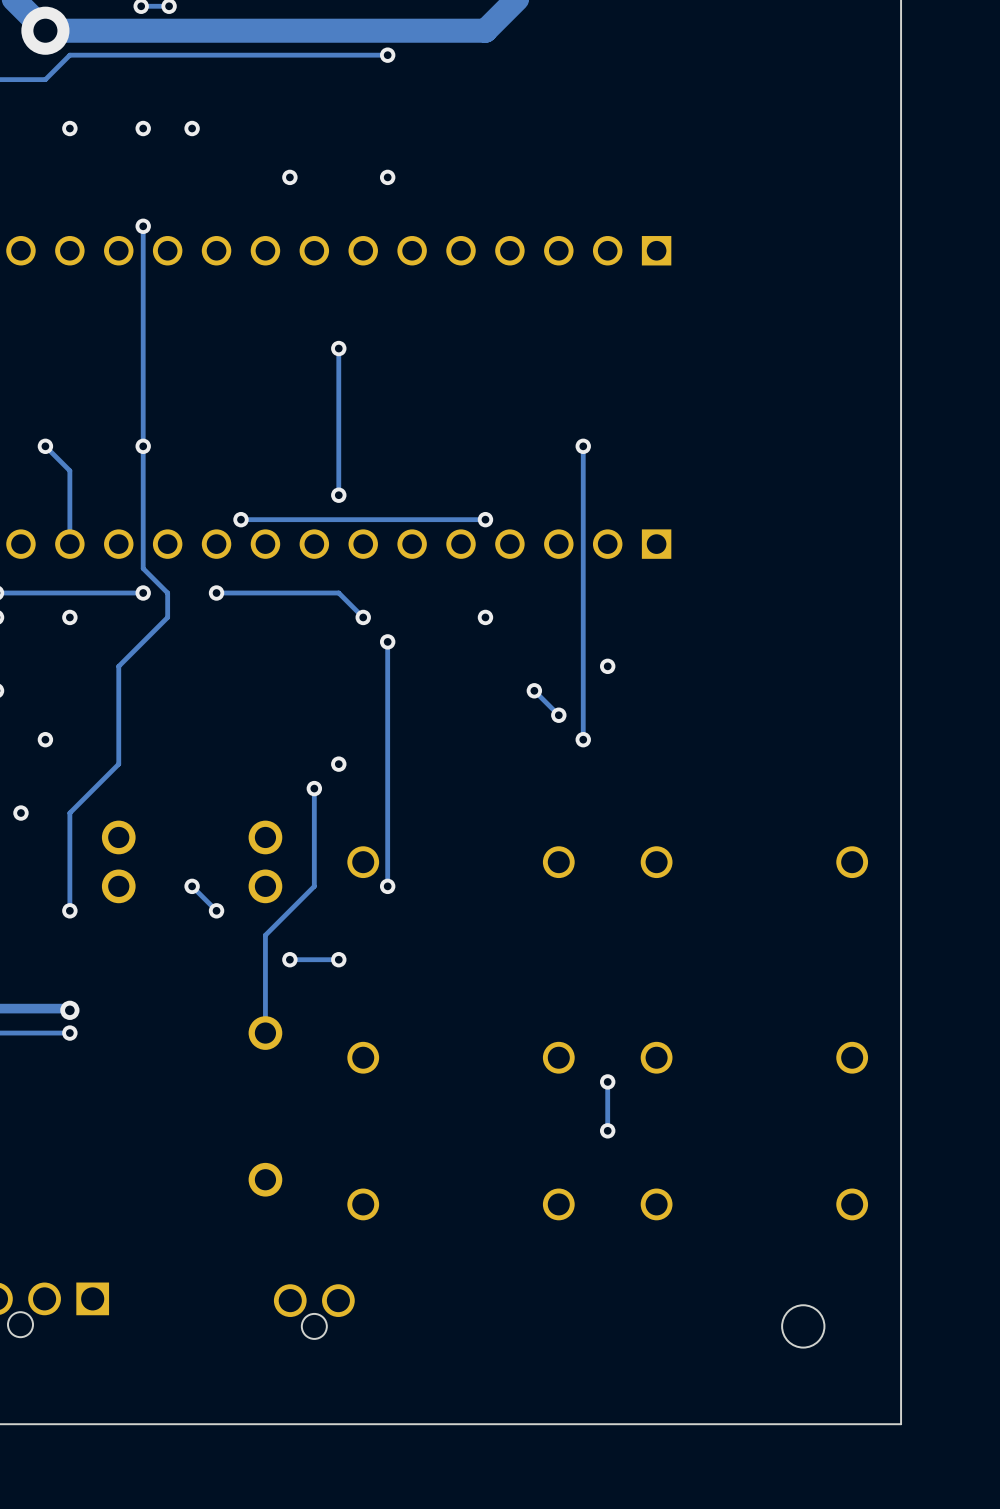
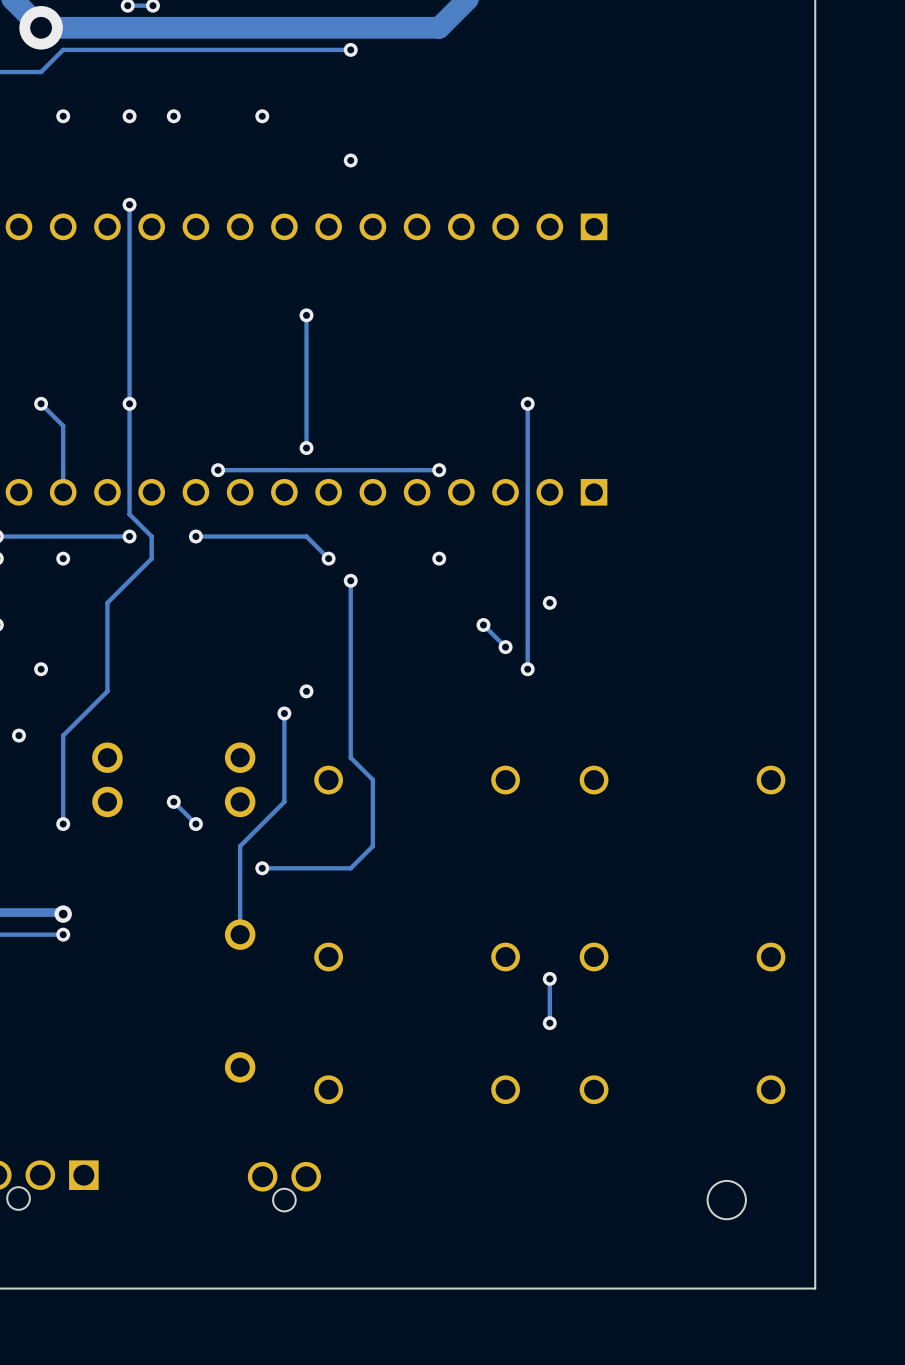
via position: (289, 177) -> (262, 116)
track: (387, 837) (387, 886) -> (350, 757) (372, 779) (372, 846) (350, 868) (306, 868)
via: (387, 886) -> none
via: (338, 959) -> none

